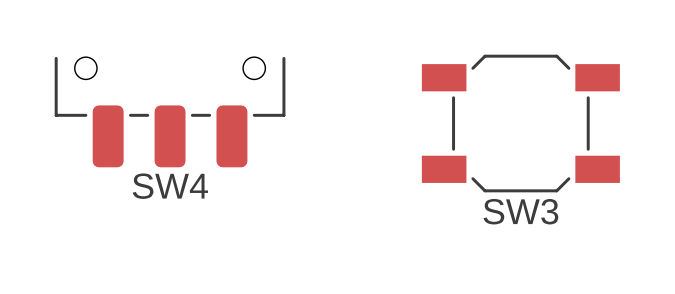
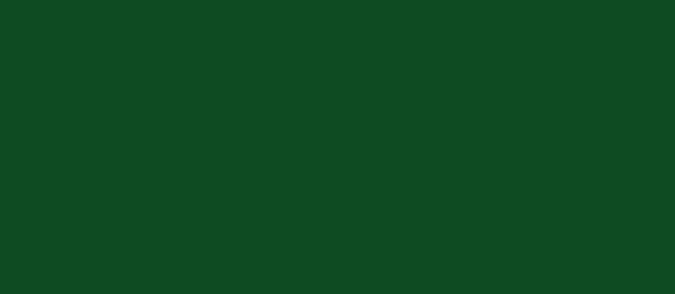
SW4: (170, 112) -> none
SW3: (520, 123) -> none

